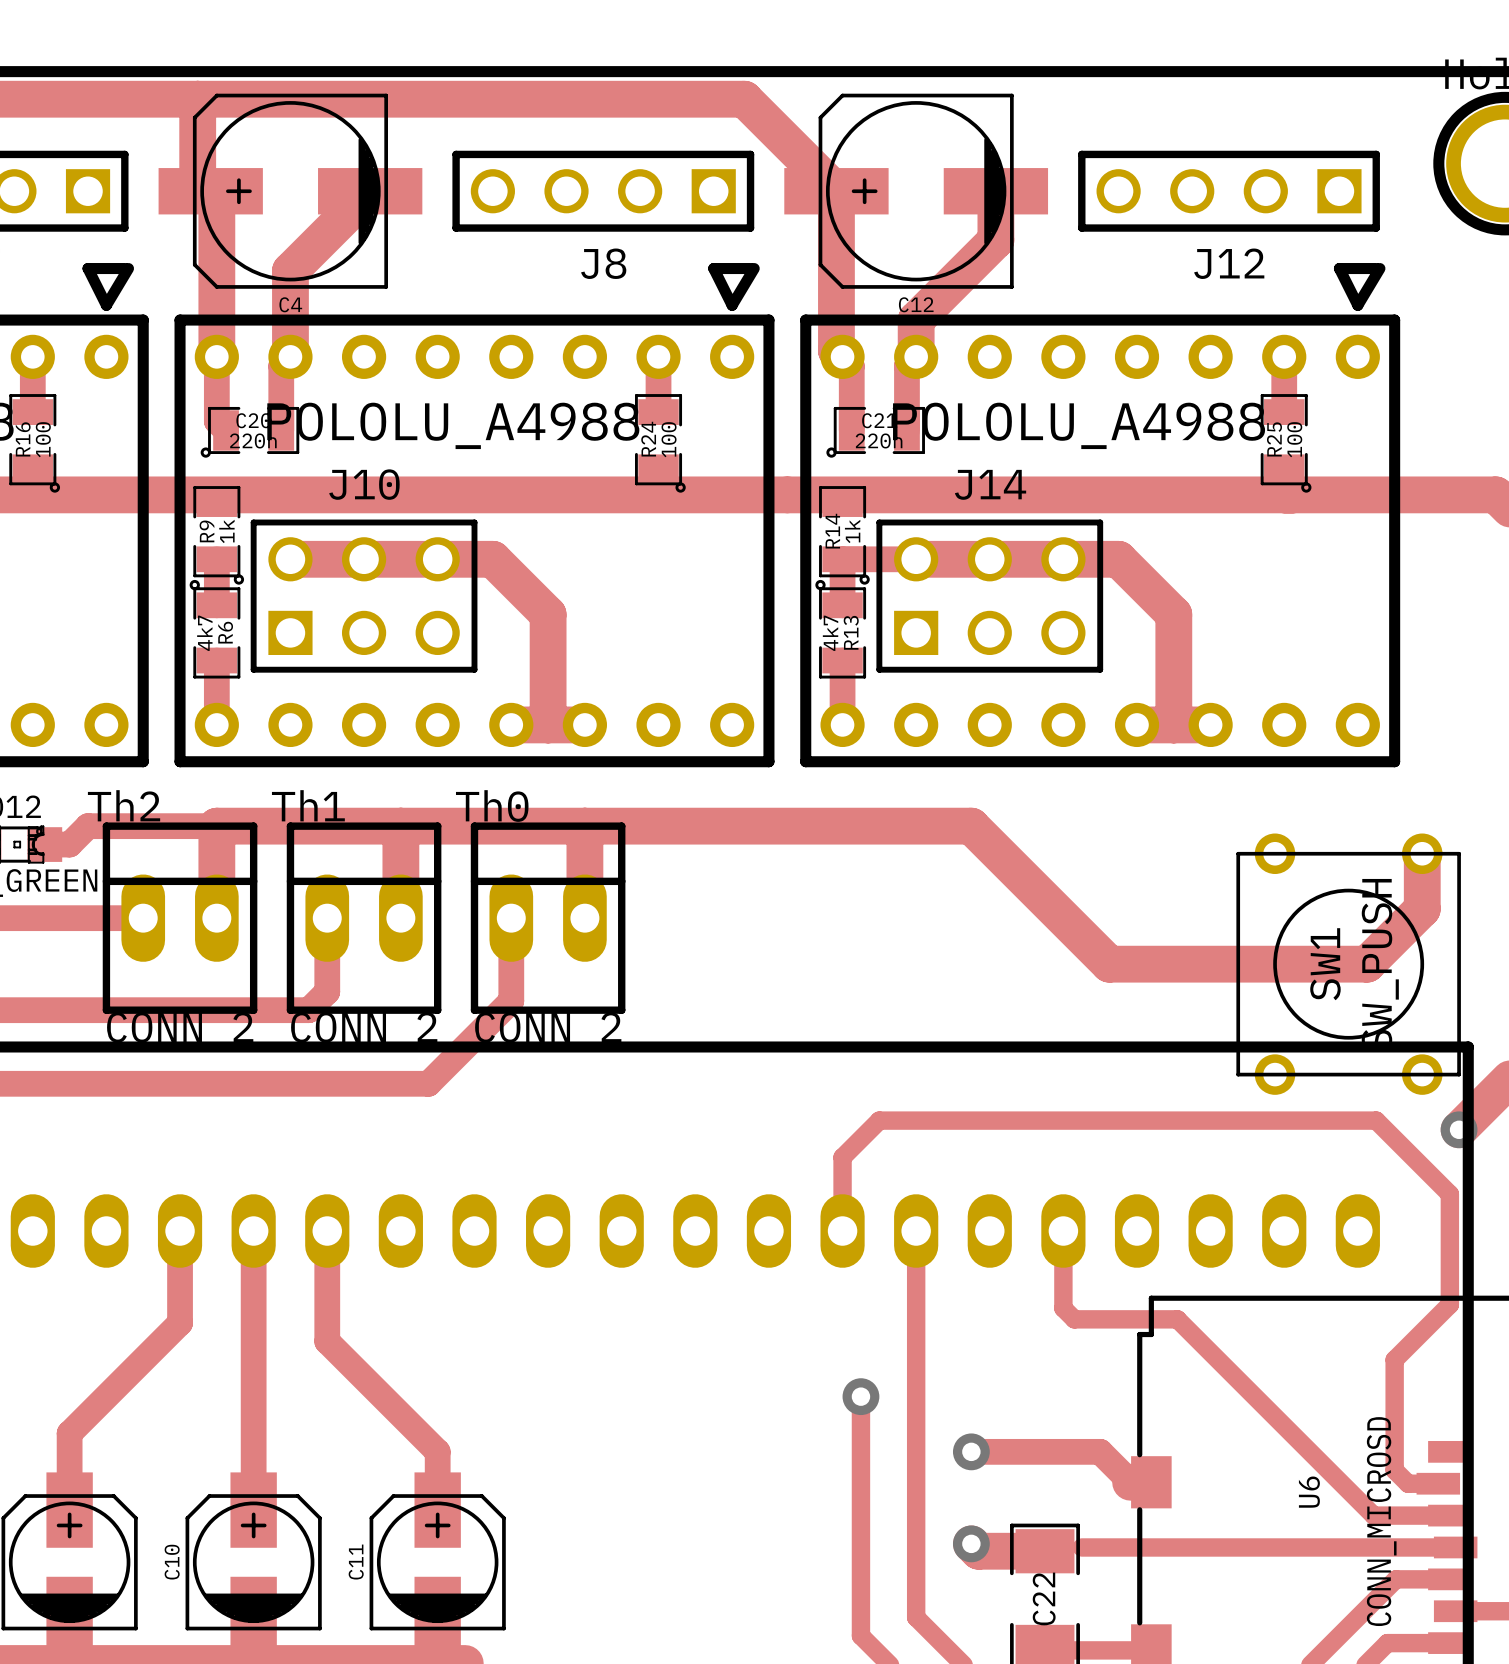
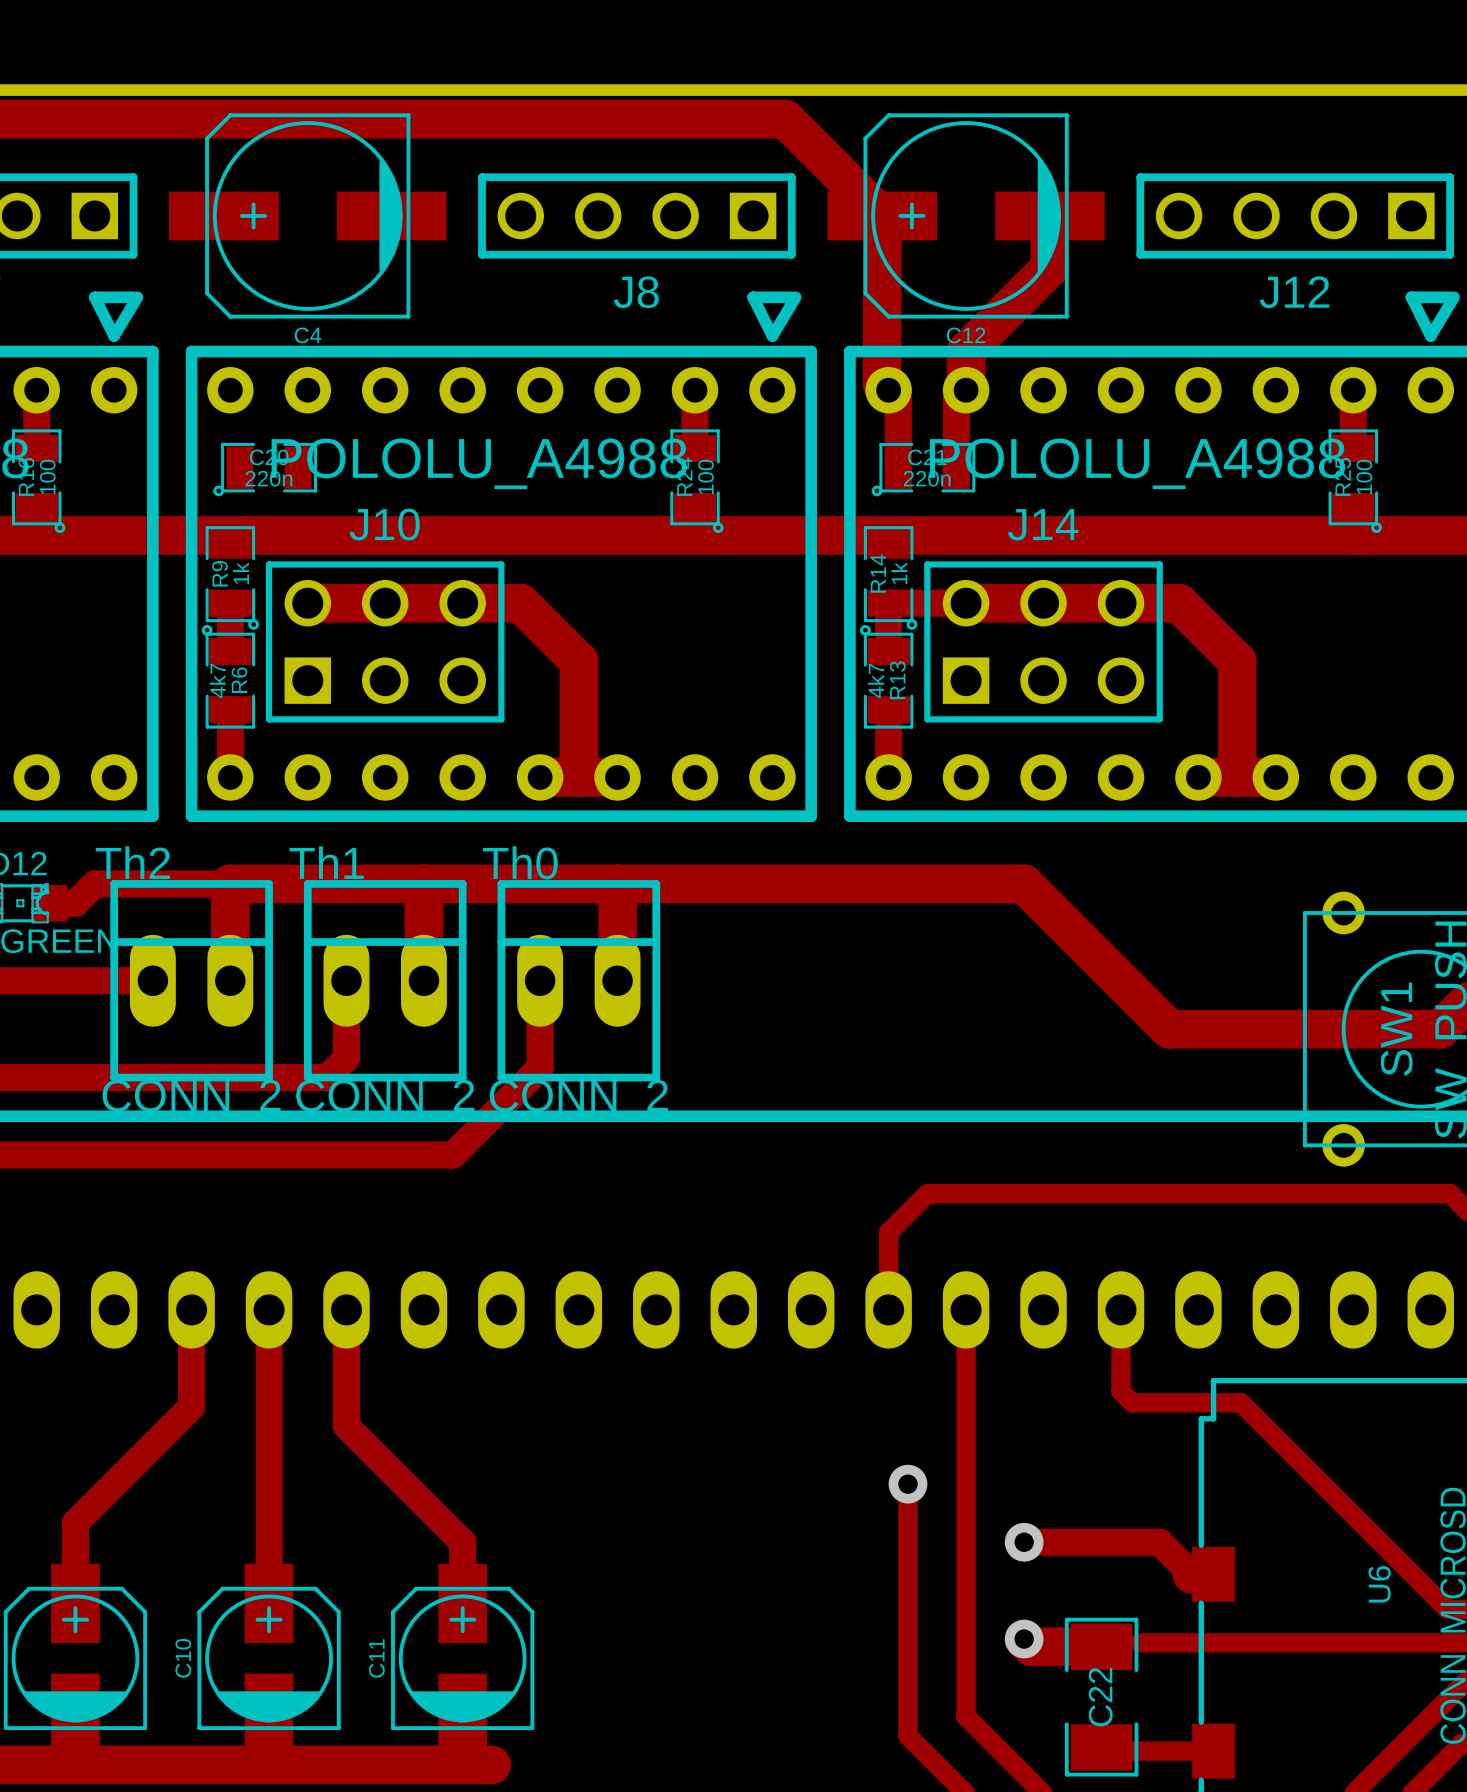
track: (197, 99) (197, 178) (216, 197) (216, 421) (226, 430) -> none
track: (370, 191) (290, 270) (290, 356) (281, 366) (281, 430) -> none

